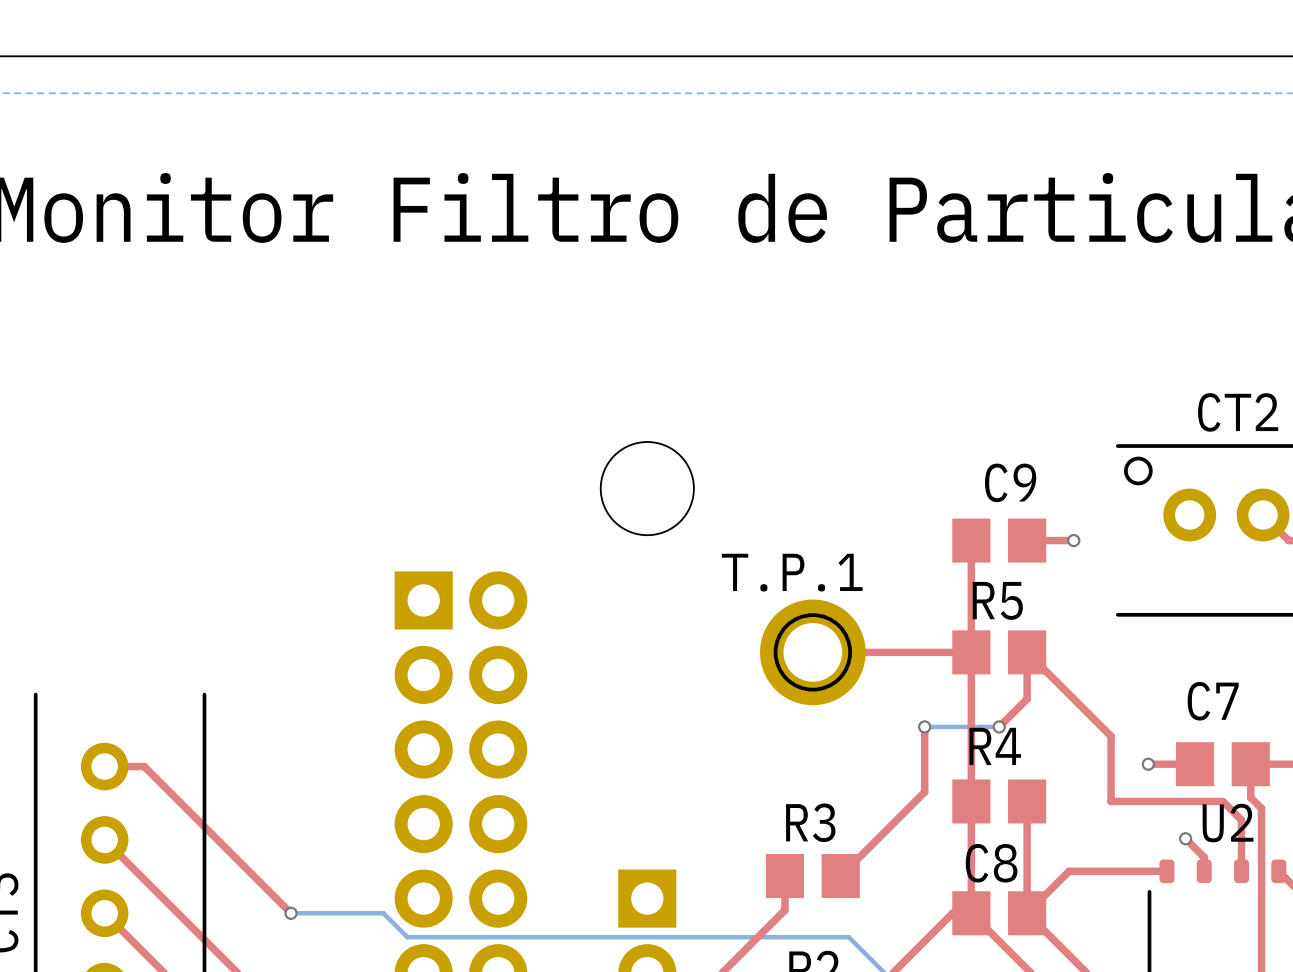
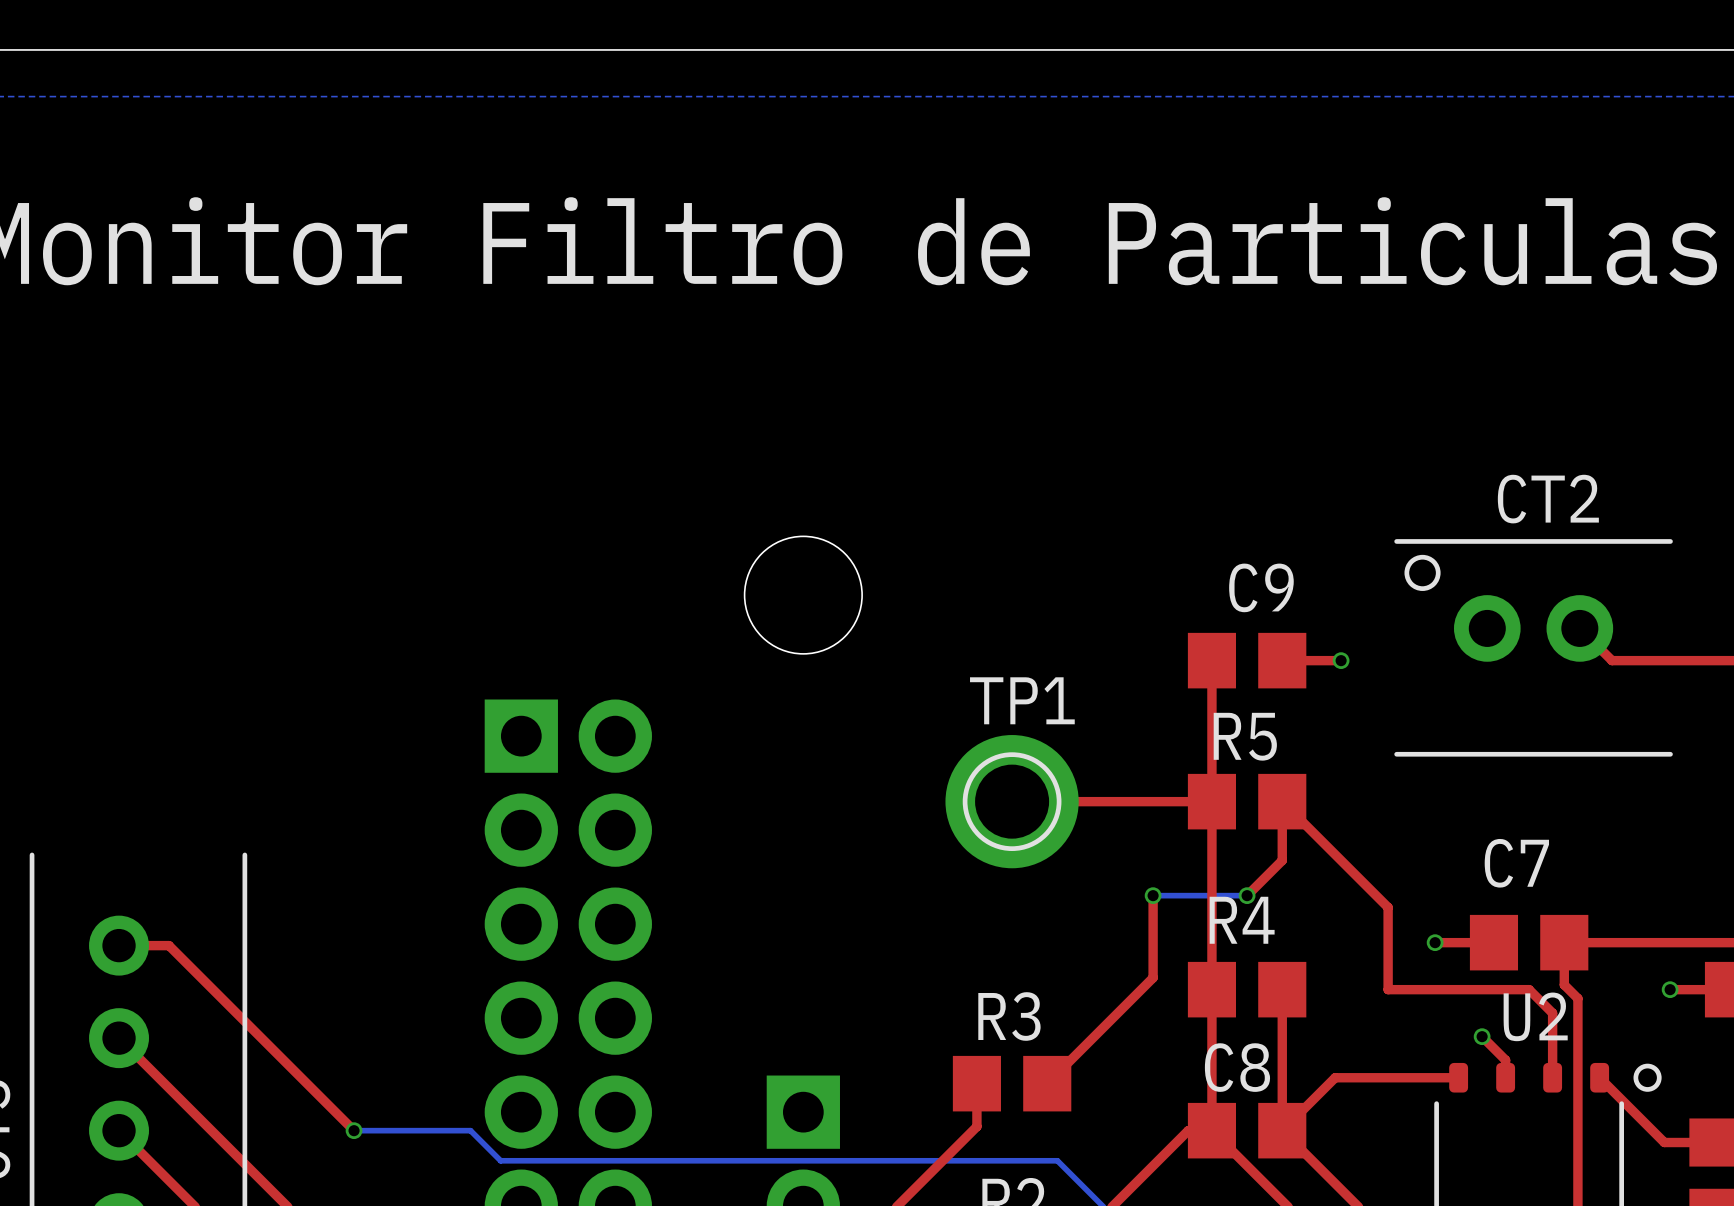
T.P.1 name: T.P.1 (792, 572) -> TP1 (1022, 700)

